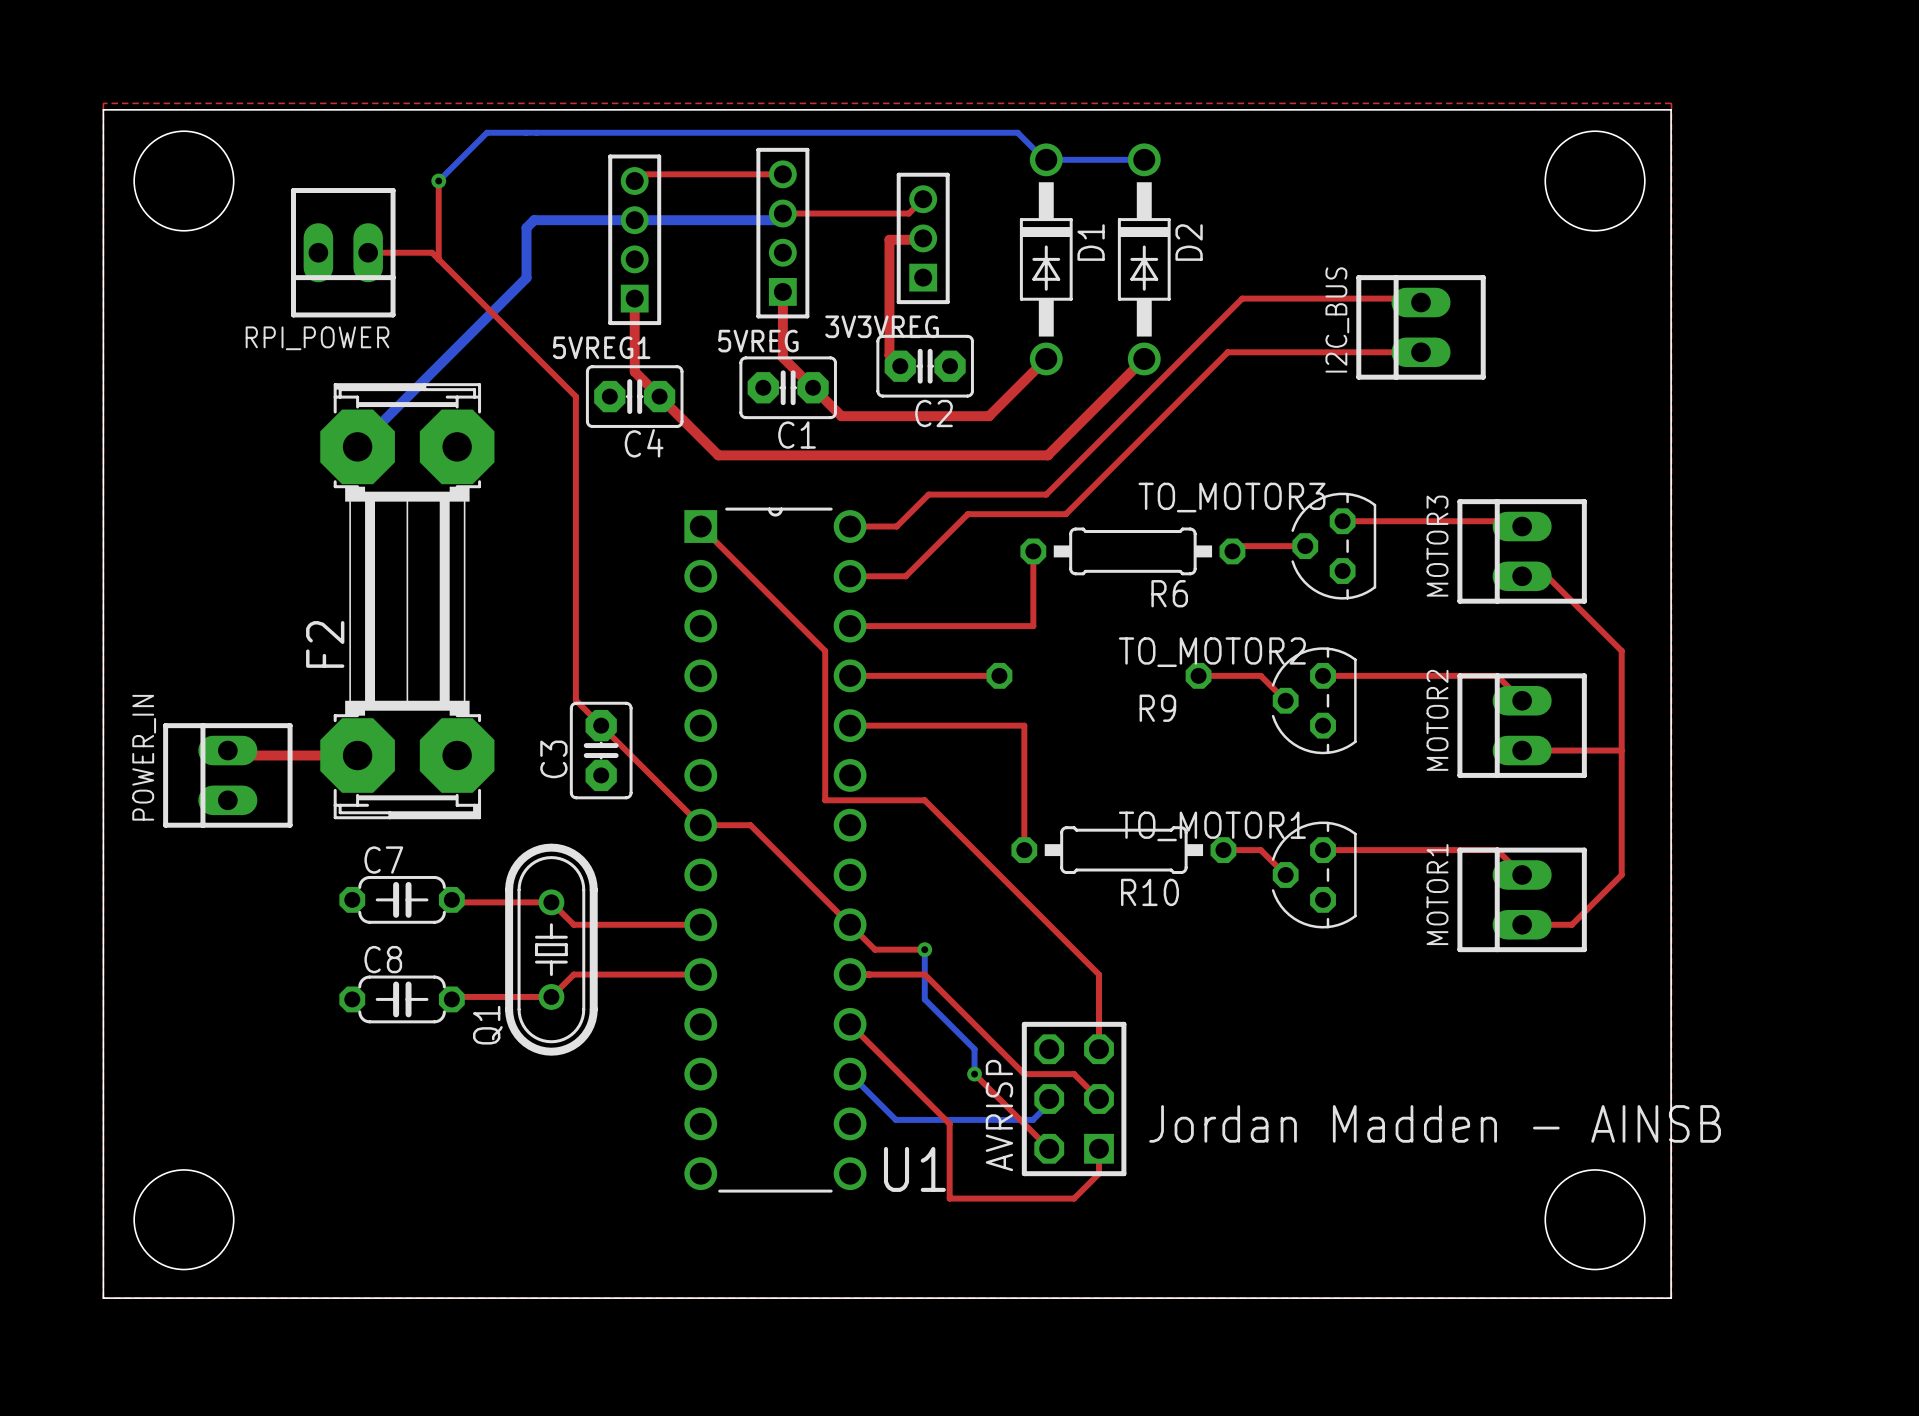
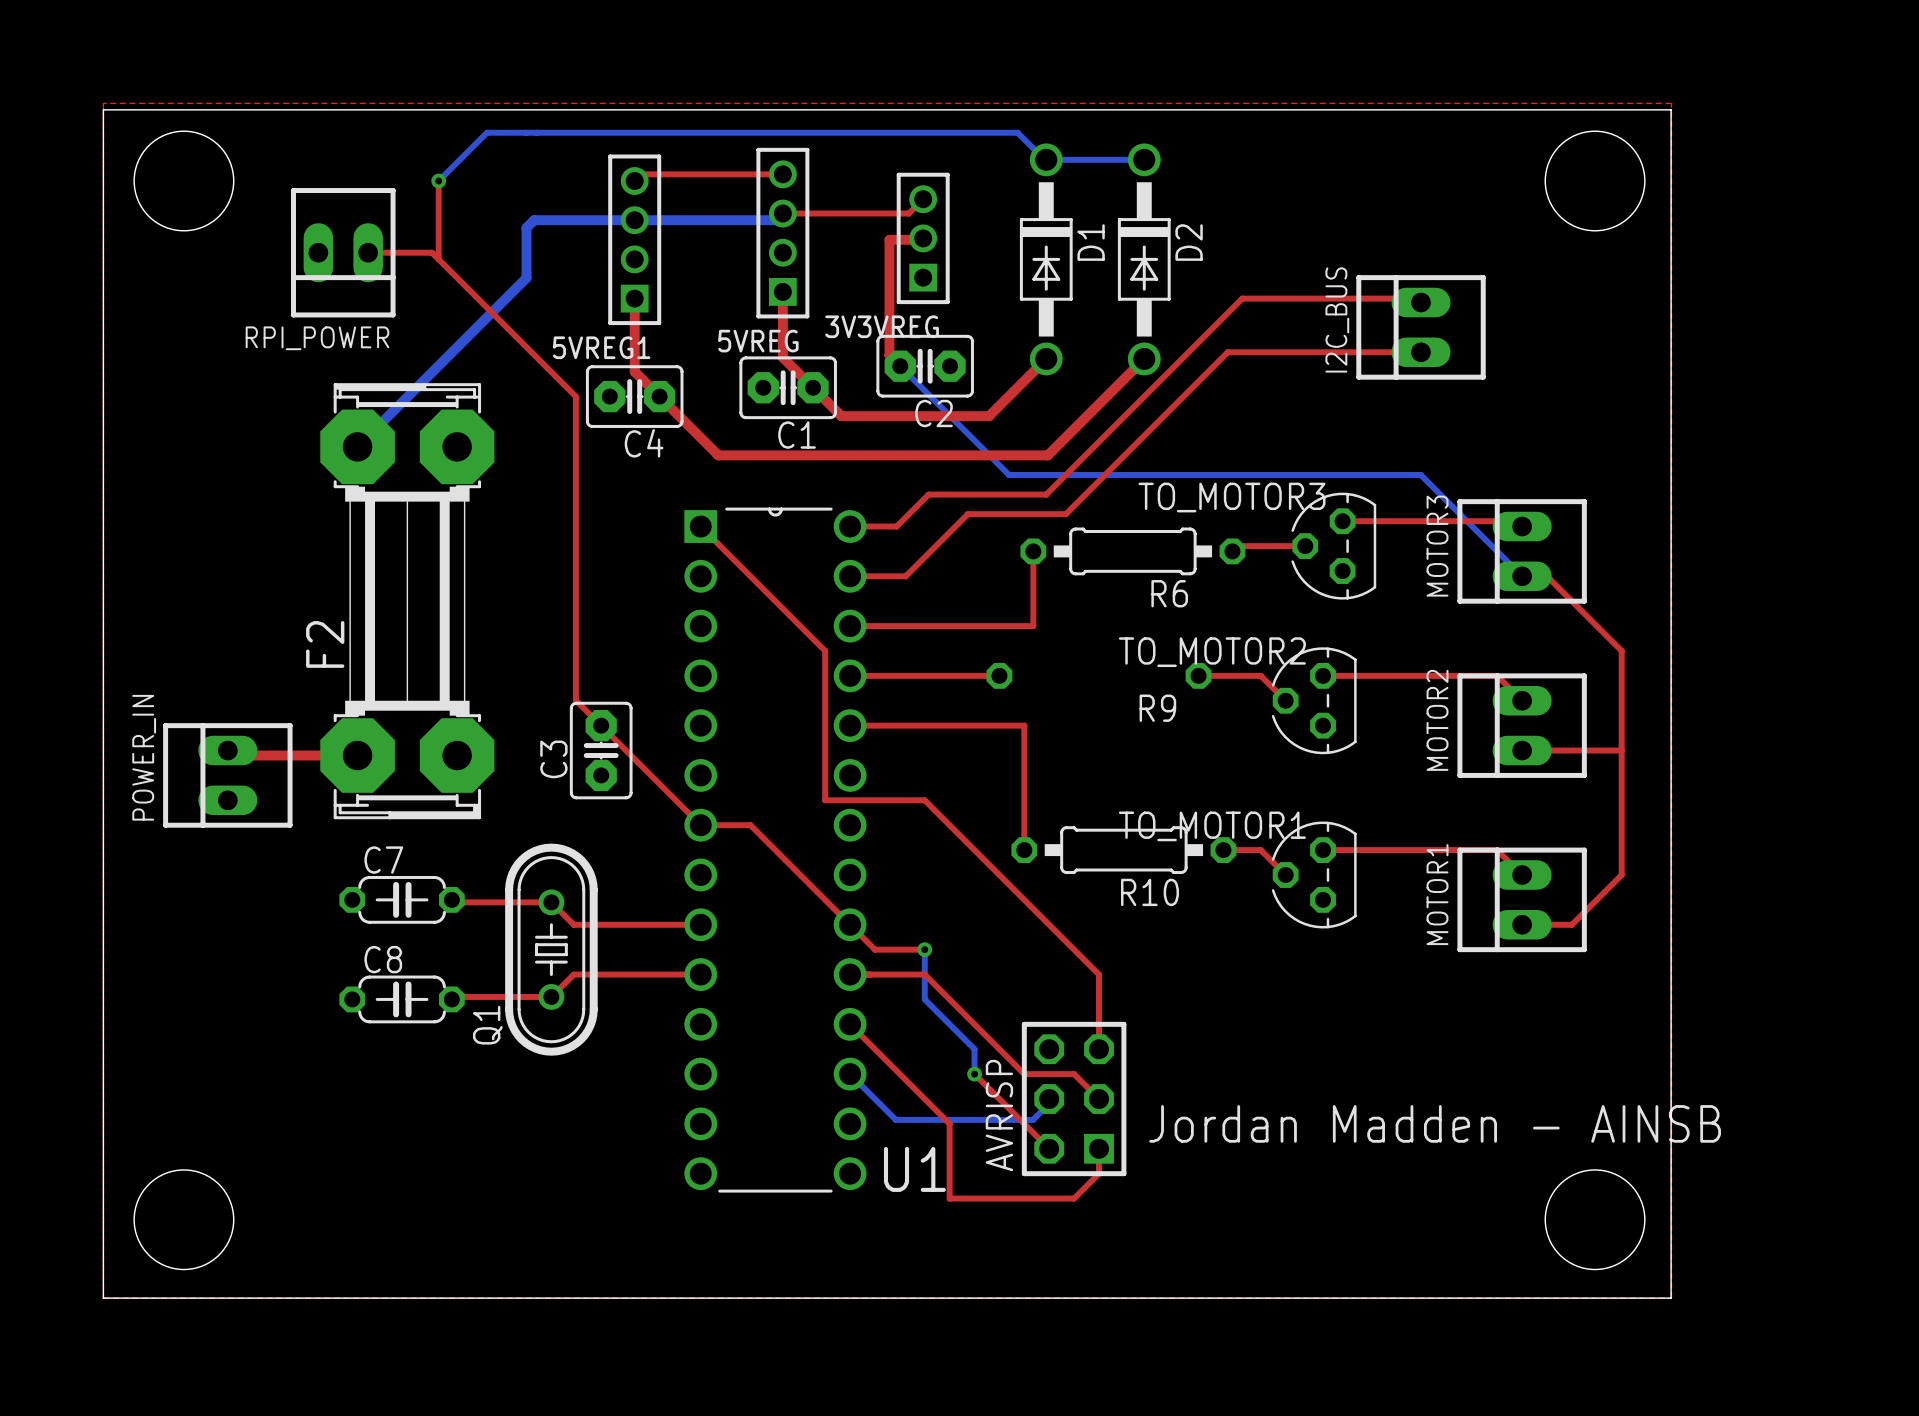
bottom track: none -> (900, 366) (1009, 474) (1420, 474) (1522, 576)

